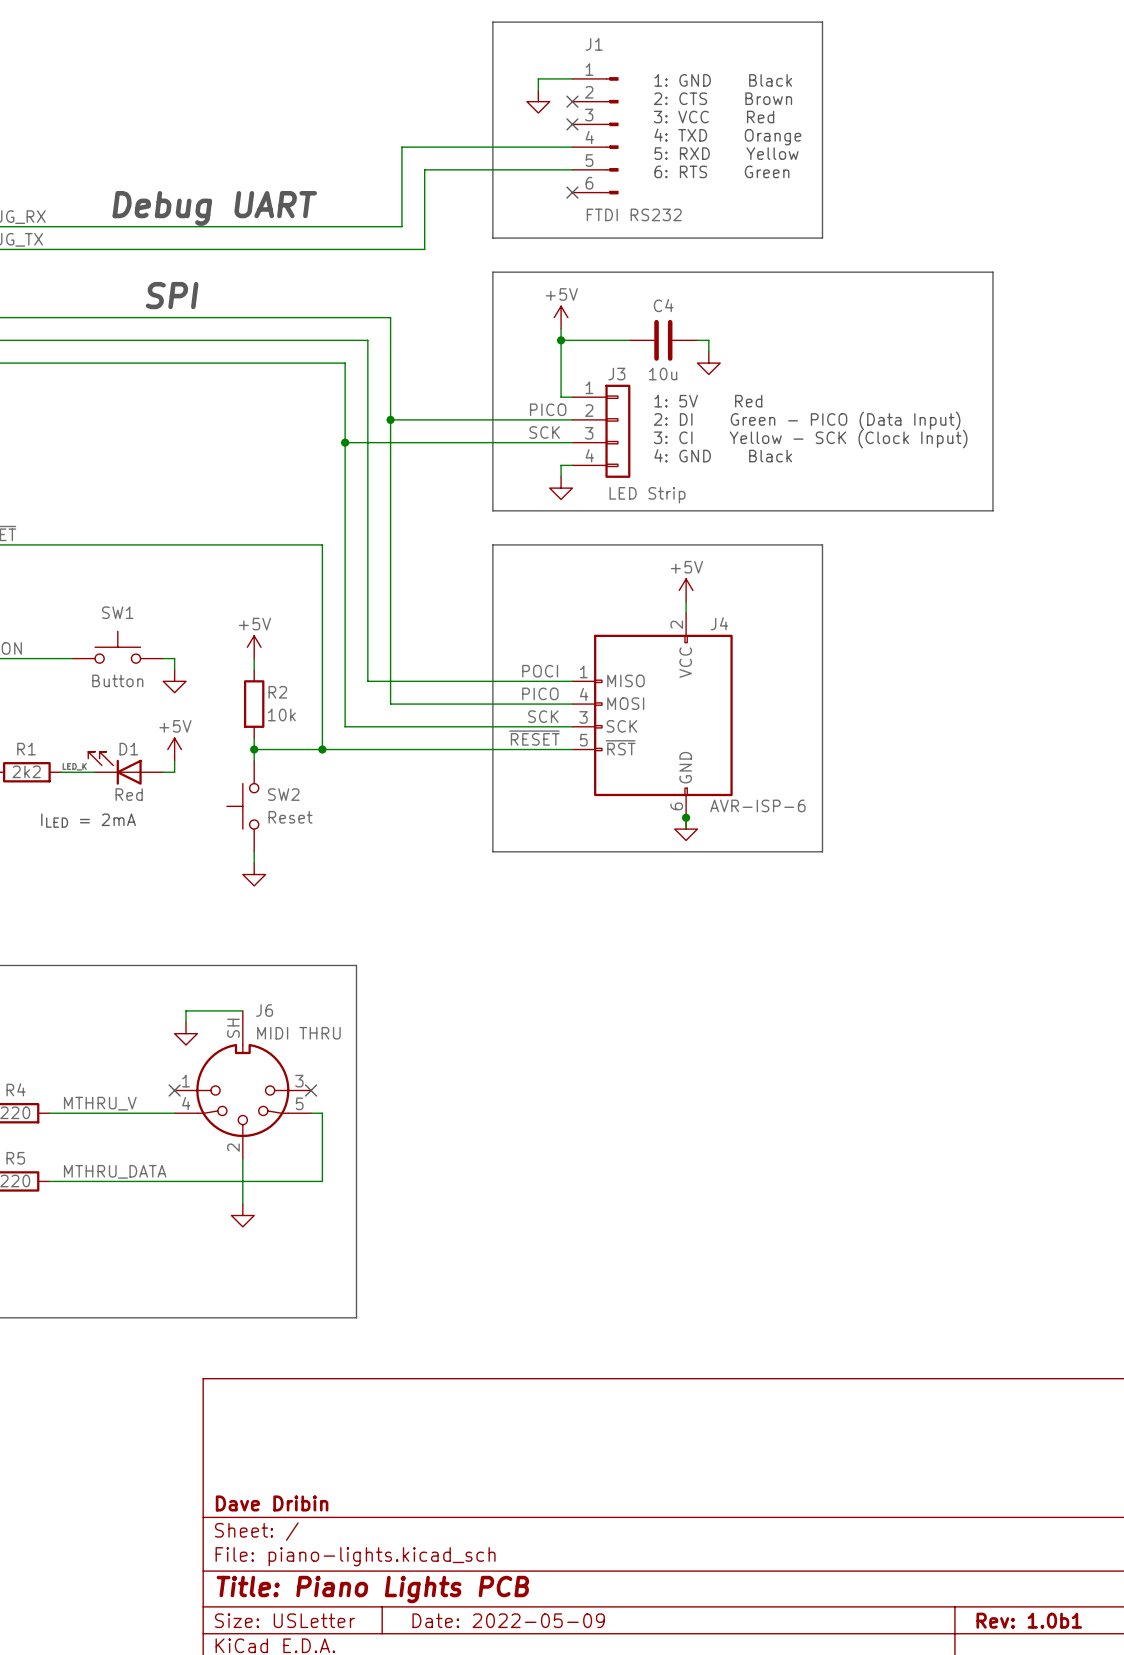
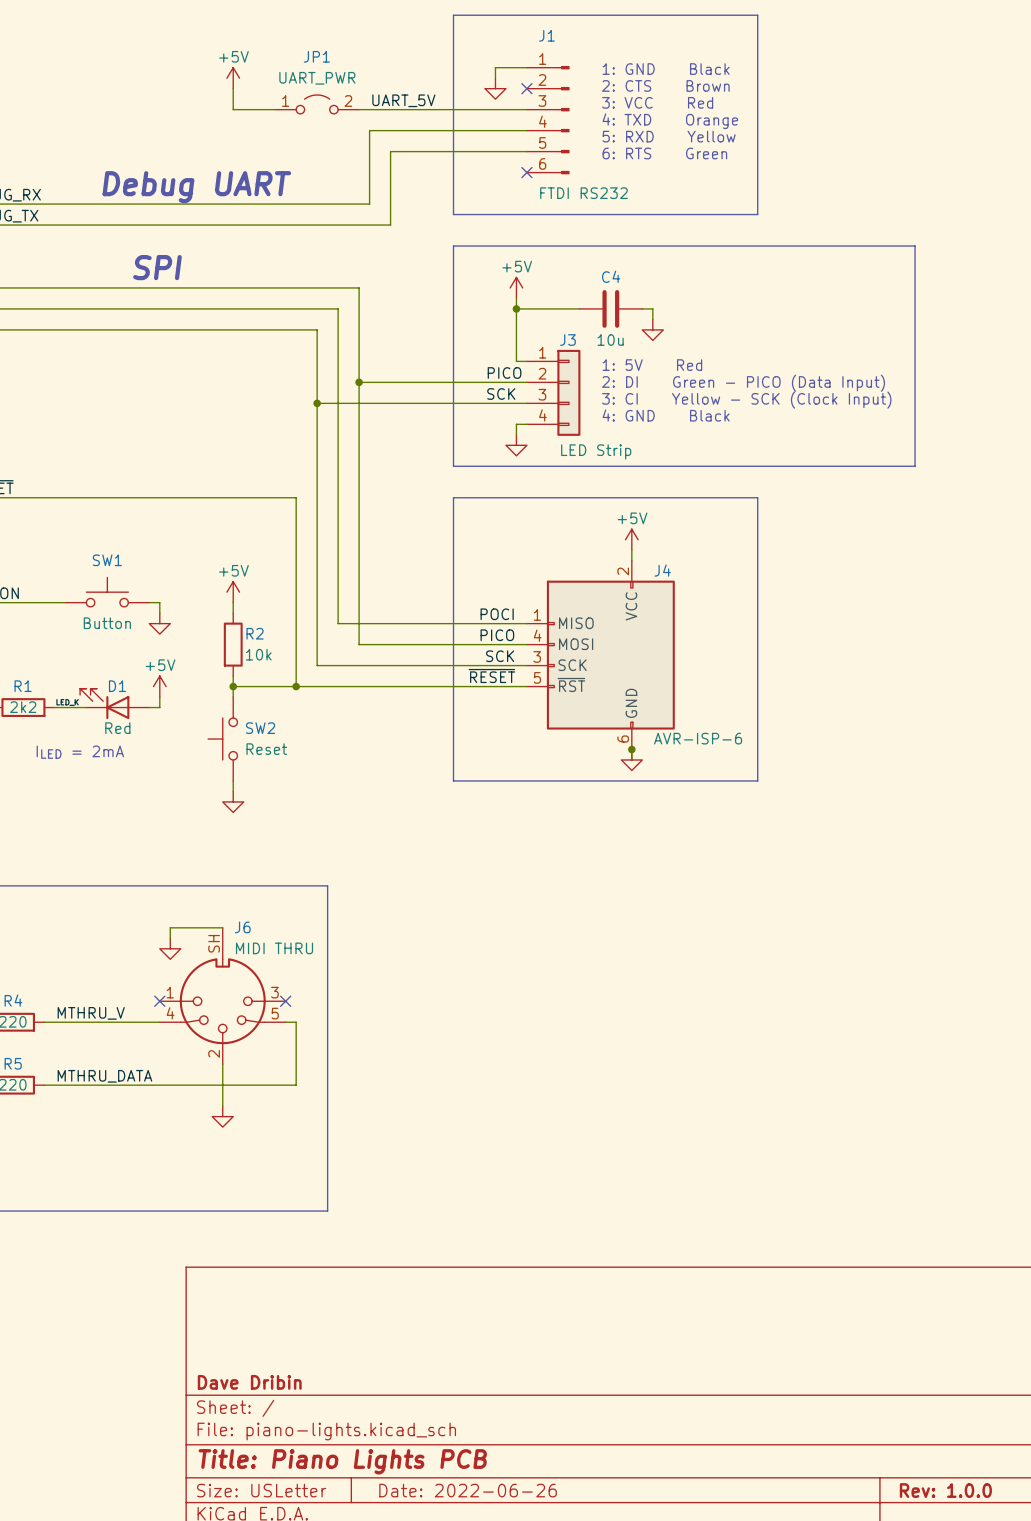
power symbol: none -> +5V (233, 78)
wire: none -> (233, 88) (233, 109) (275, 109)
label: none -> UART_5V (403, 100)
JP1: none -> UART_PWR (317, 104)
wire: none -> (359, 109) (526, 109)
no-connect mark: (572, 124) -> none
title block: Date: 2022-05-09 (508, 1620) -> Date: 2022-06-26 (468, 1490)
title block: Rev: 1.0b1 (1029, 1620) -> Rev: 1.0.0 (945, 1490)

